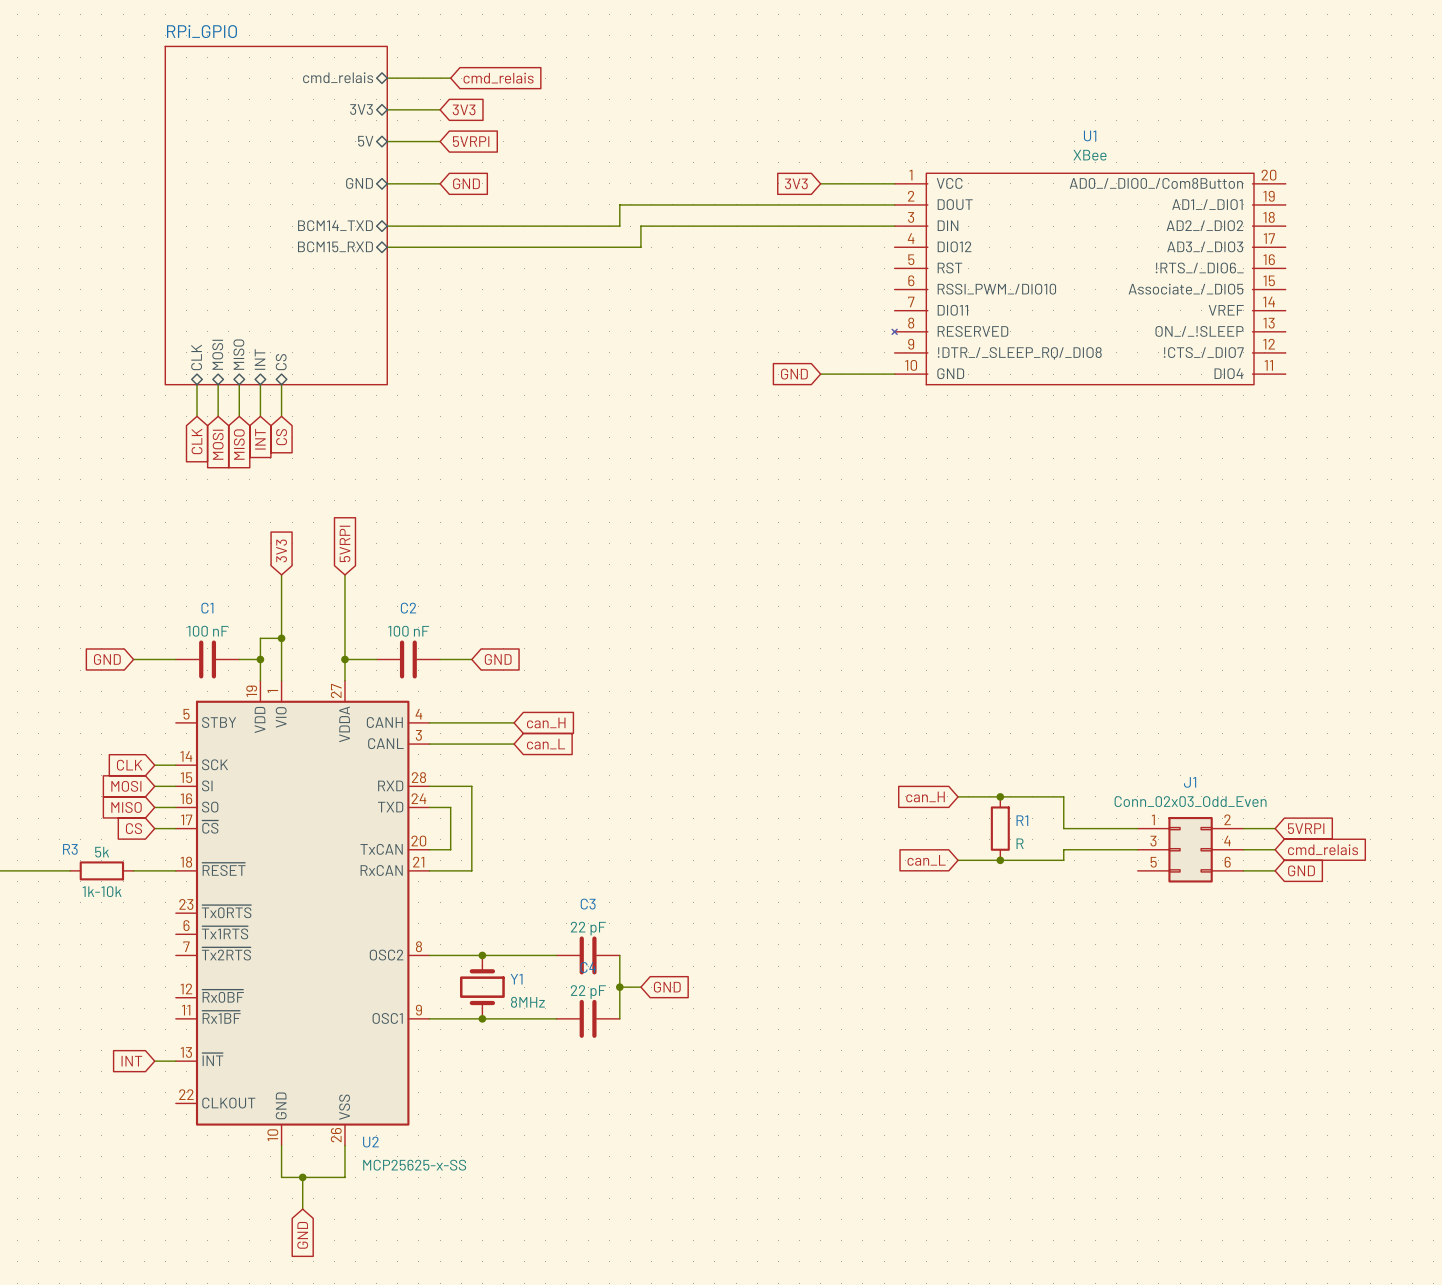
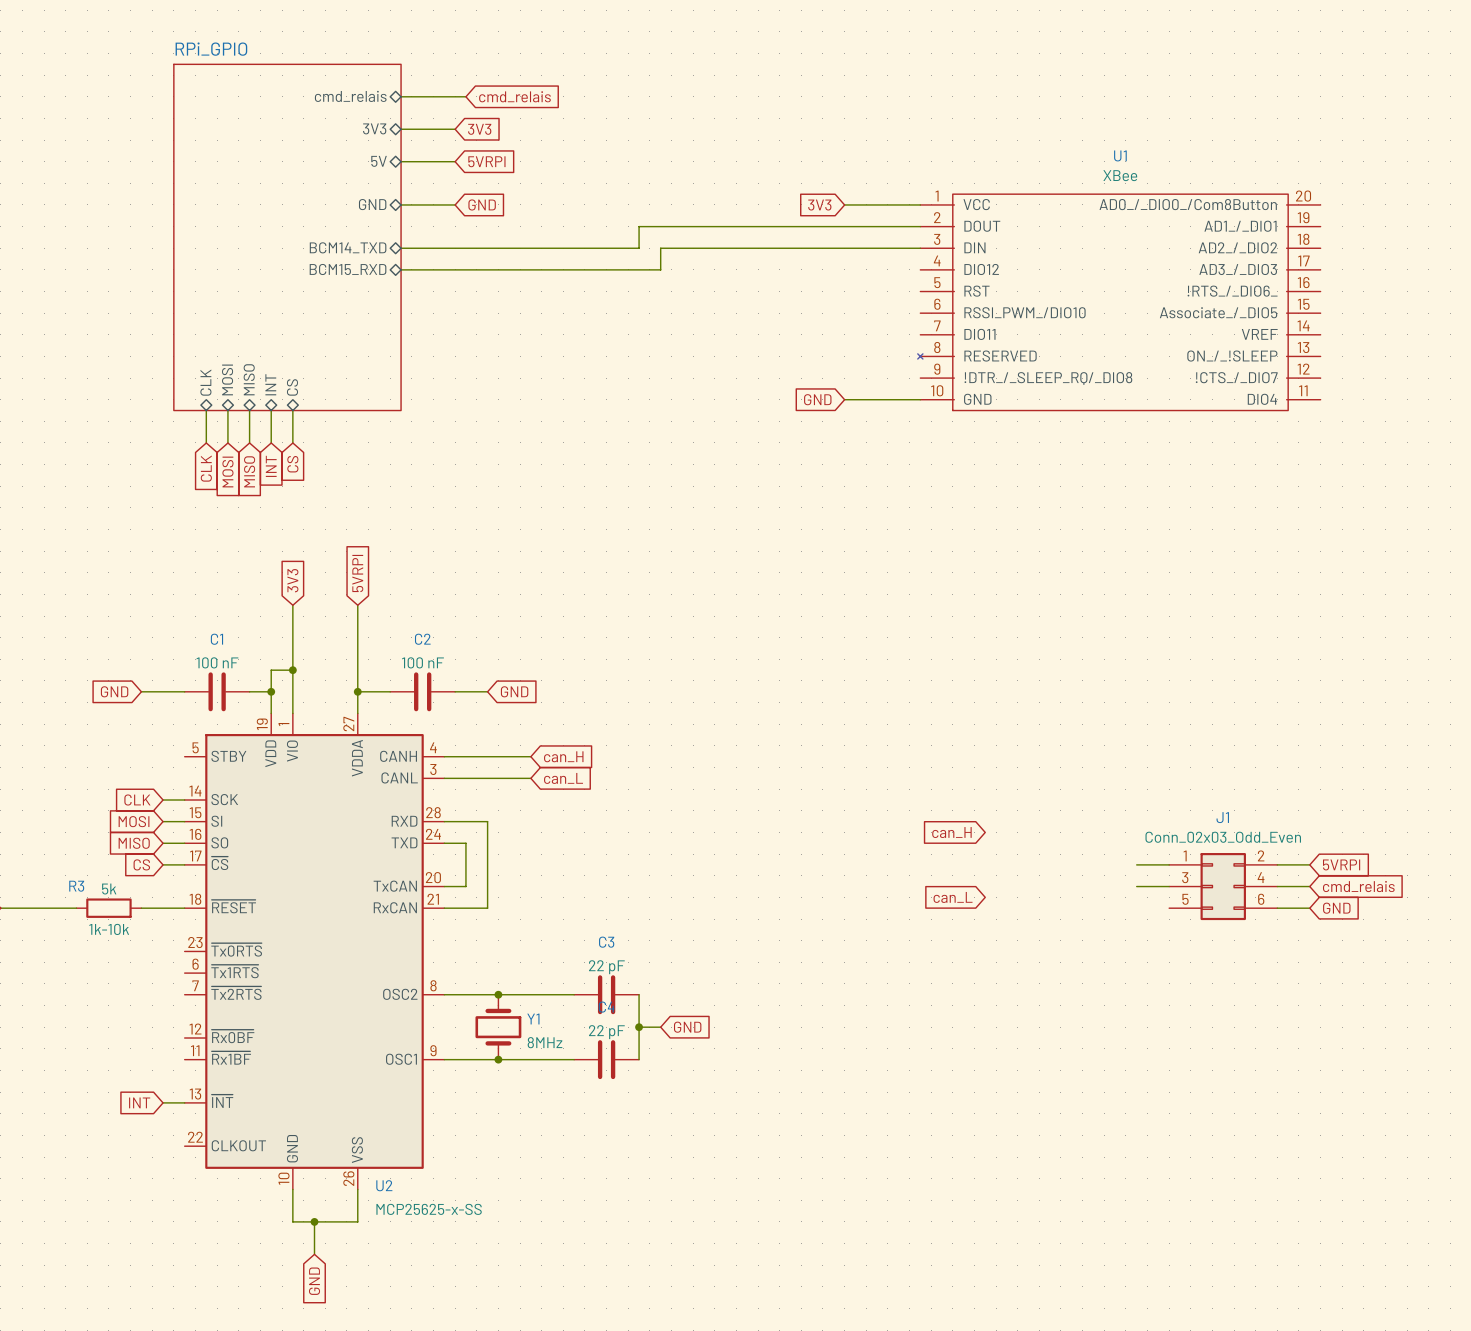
wire: (958, 796) (1063, 796) (1063, 828) (1106, 828) -> none
junction: (1000, 796) -> none
R1: R (1000, 828) -> none
wire: (1106, 849) (1063, 849) (1063, 860) (958, 860) -> none
junction: (1000, 860) -> none

